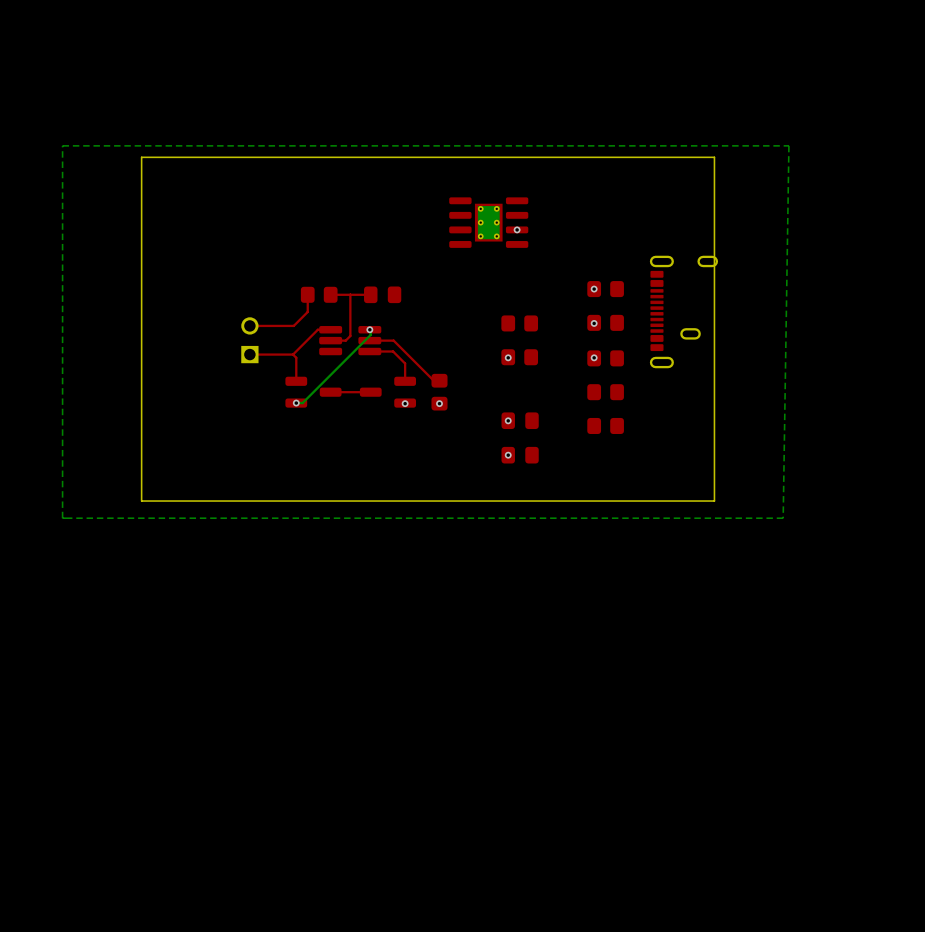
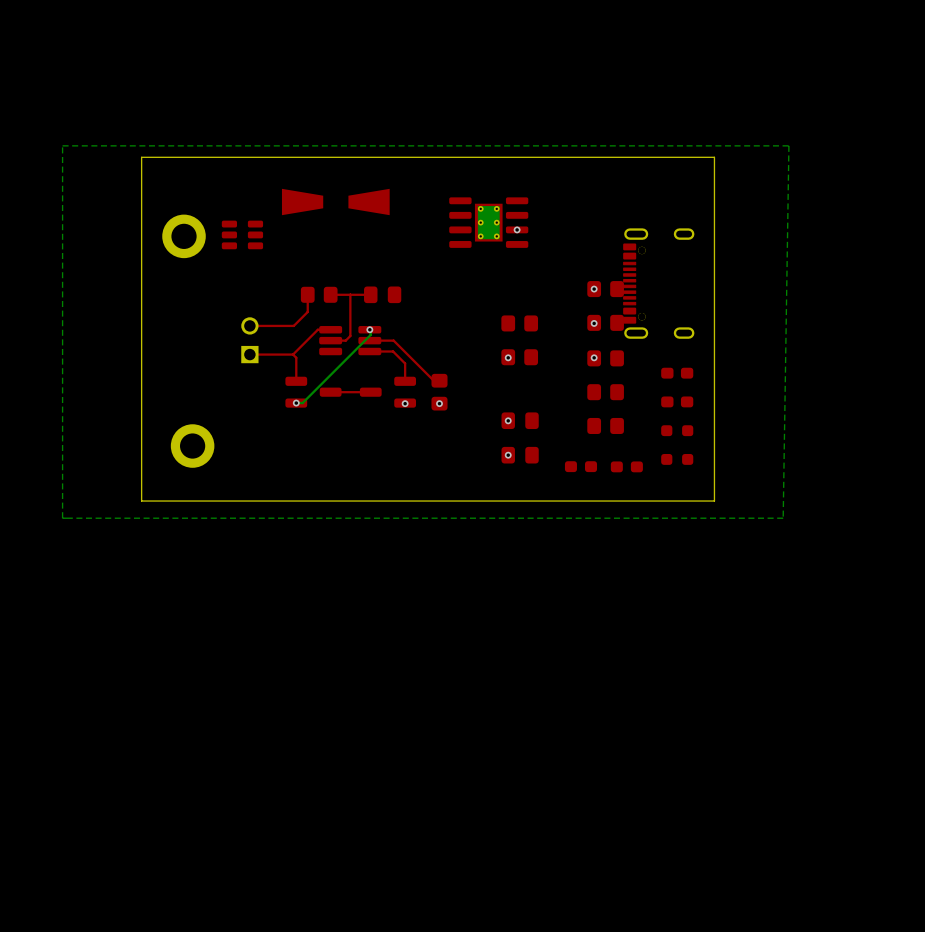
part: none -> (335, 202)
part: none -> (242, 234)
part: none -> (184, 236)
part: none -> (658, 283)
part: (683, 311) -> none
part: none -> (677, 373)
part: none -> (677, 401)
part: none -> (677, 430)
part: none -> (192, 446)
part: none -> (677, 459)
part: none -> (580, 466)
part: none -> (626, 466)

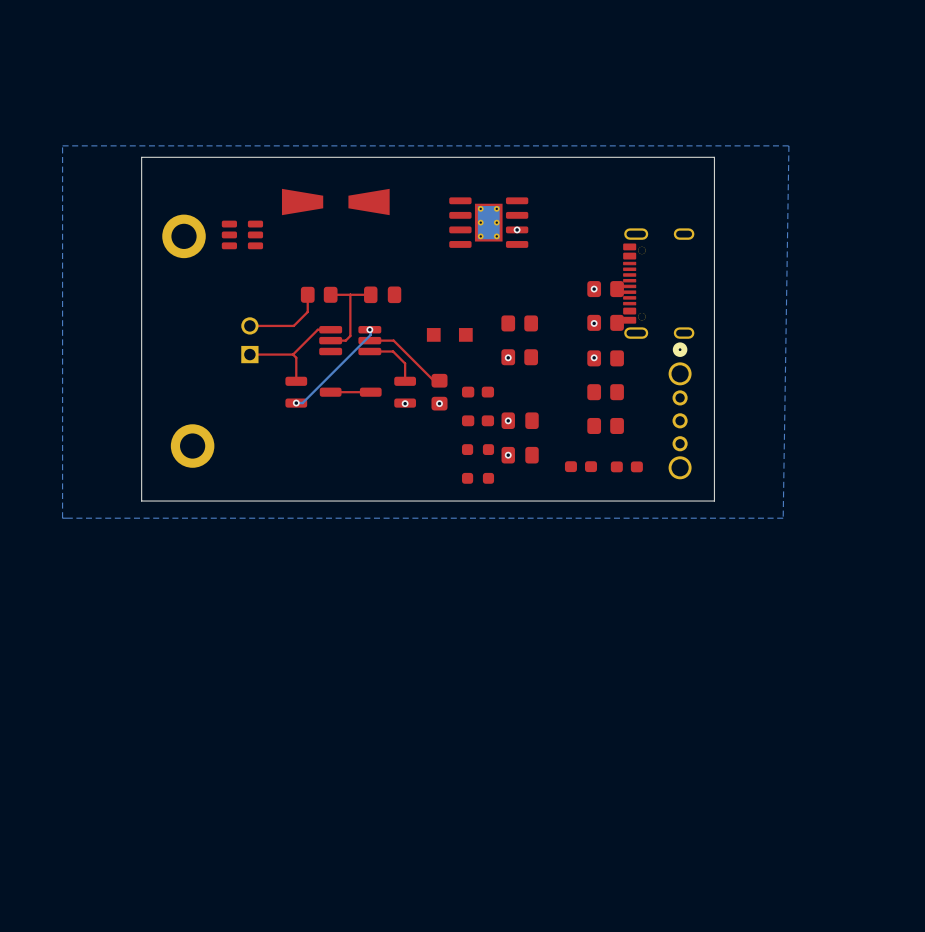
part: none -> (449, 334)
part: (677, 373) -> none
part: none -> (478, 392)
part footprint: [661, 396, 694, 408] -> [668, 342, 692, 480]
part: none -> (478, 420)
part: (677, 430) -> none
part: none -> (478, 449)
part: (677, 459) -> none
part: none -> (478, 478)

